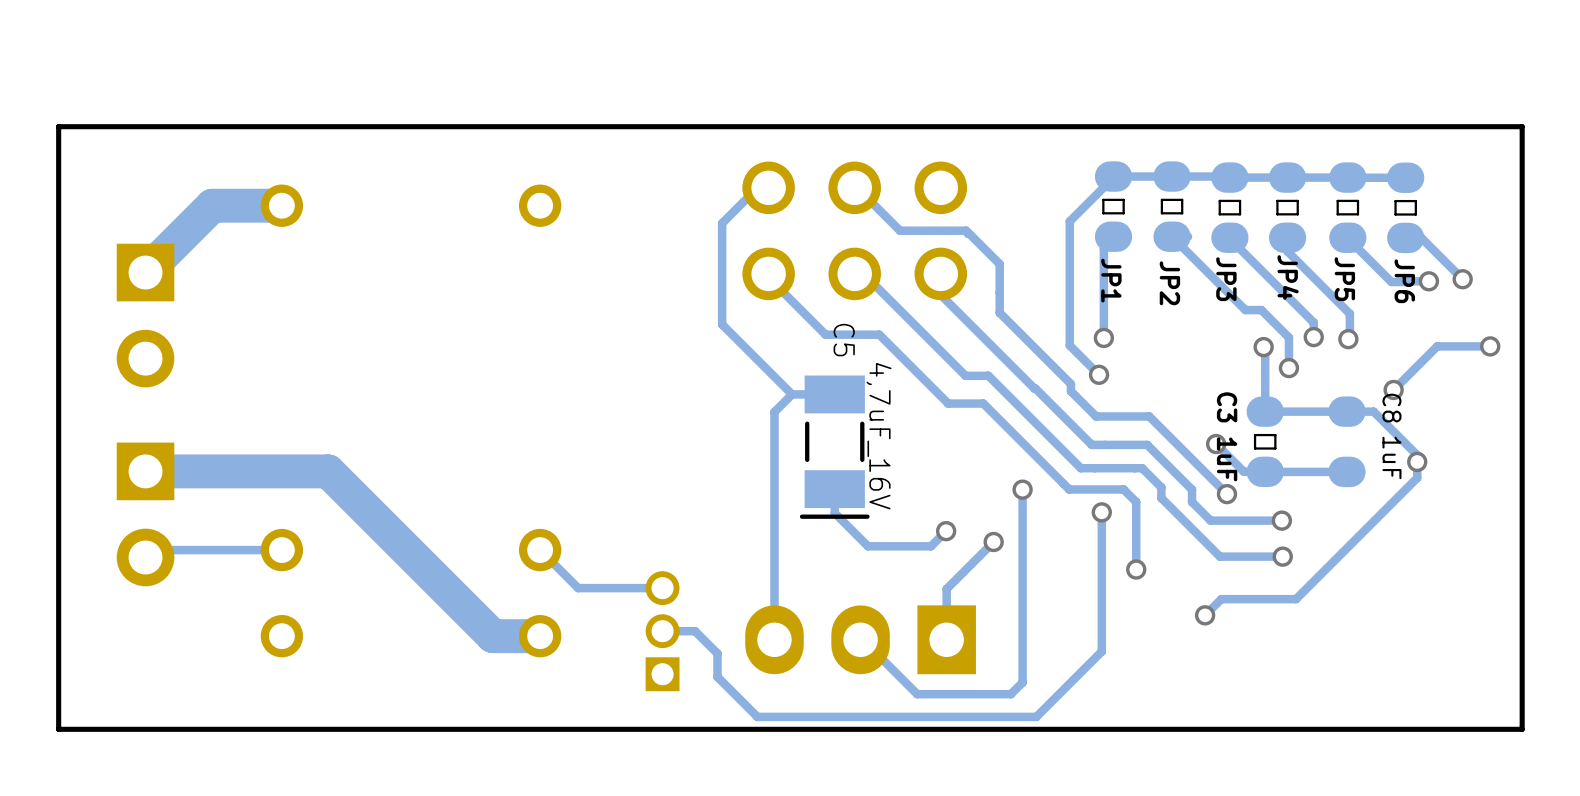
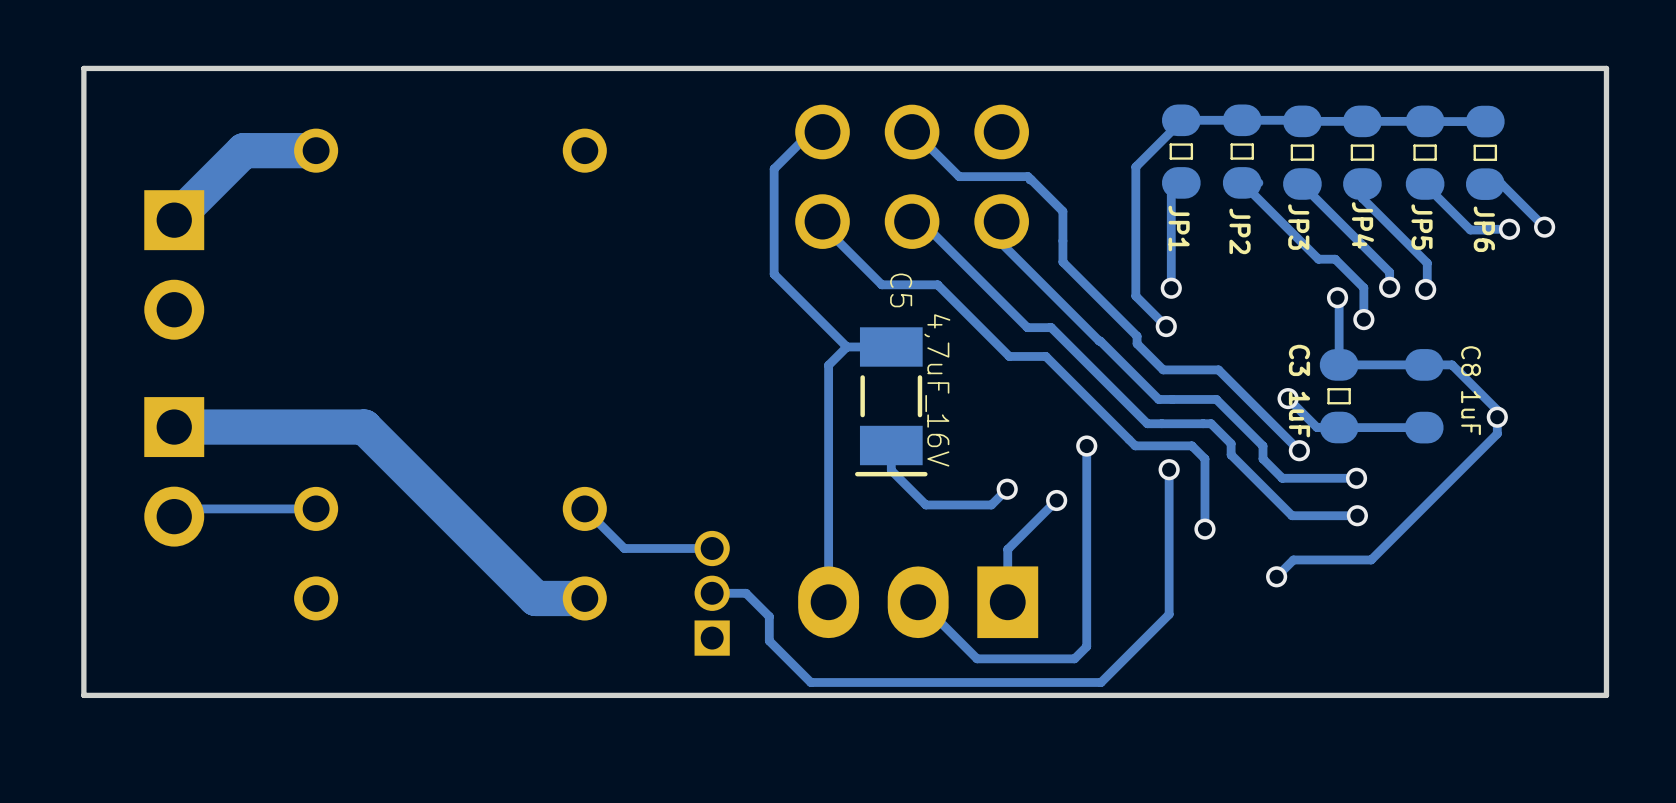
track: (1490, 346) (1437, 346) (1393, 389) -> none
via: (1490, 346) -> none
via: (1393, 389) -> none

